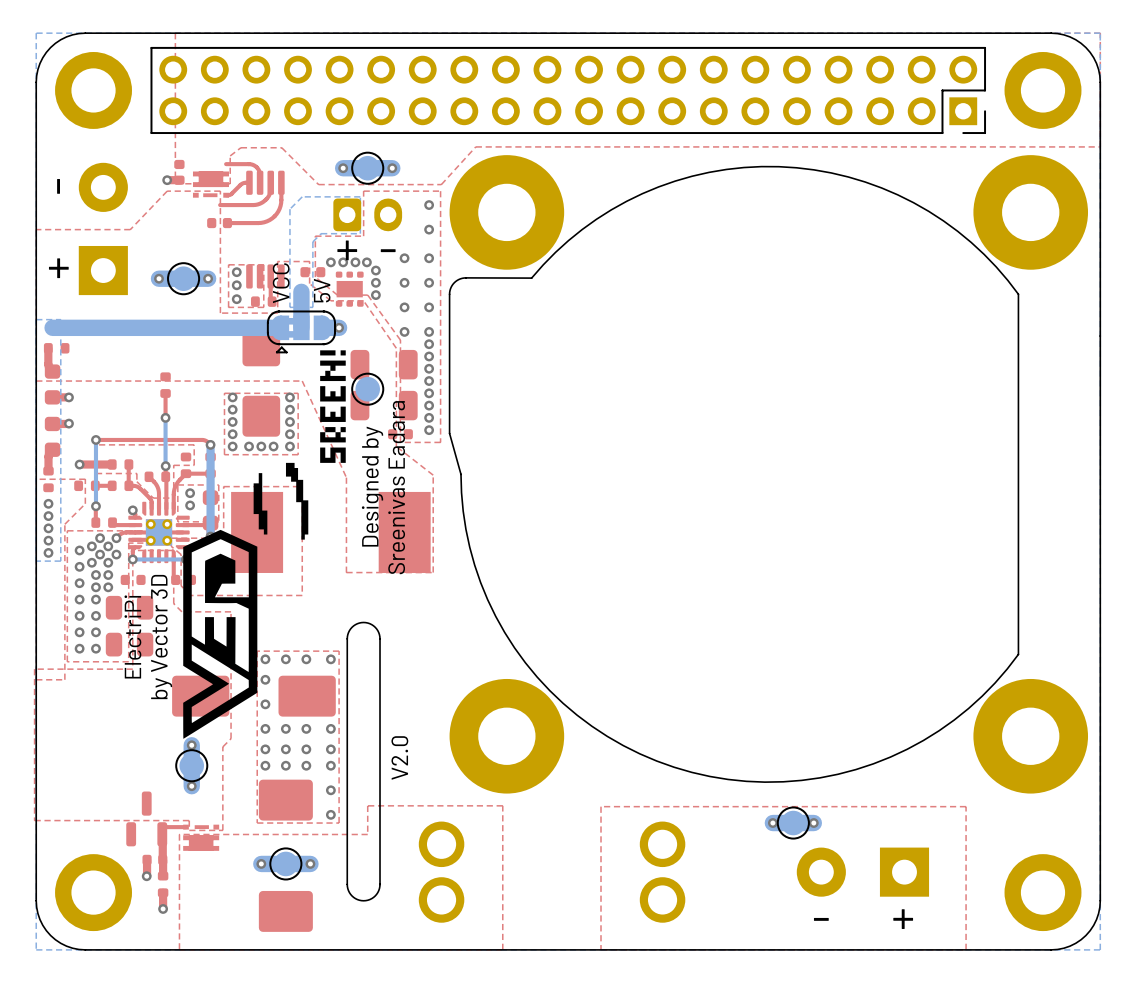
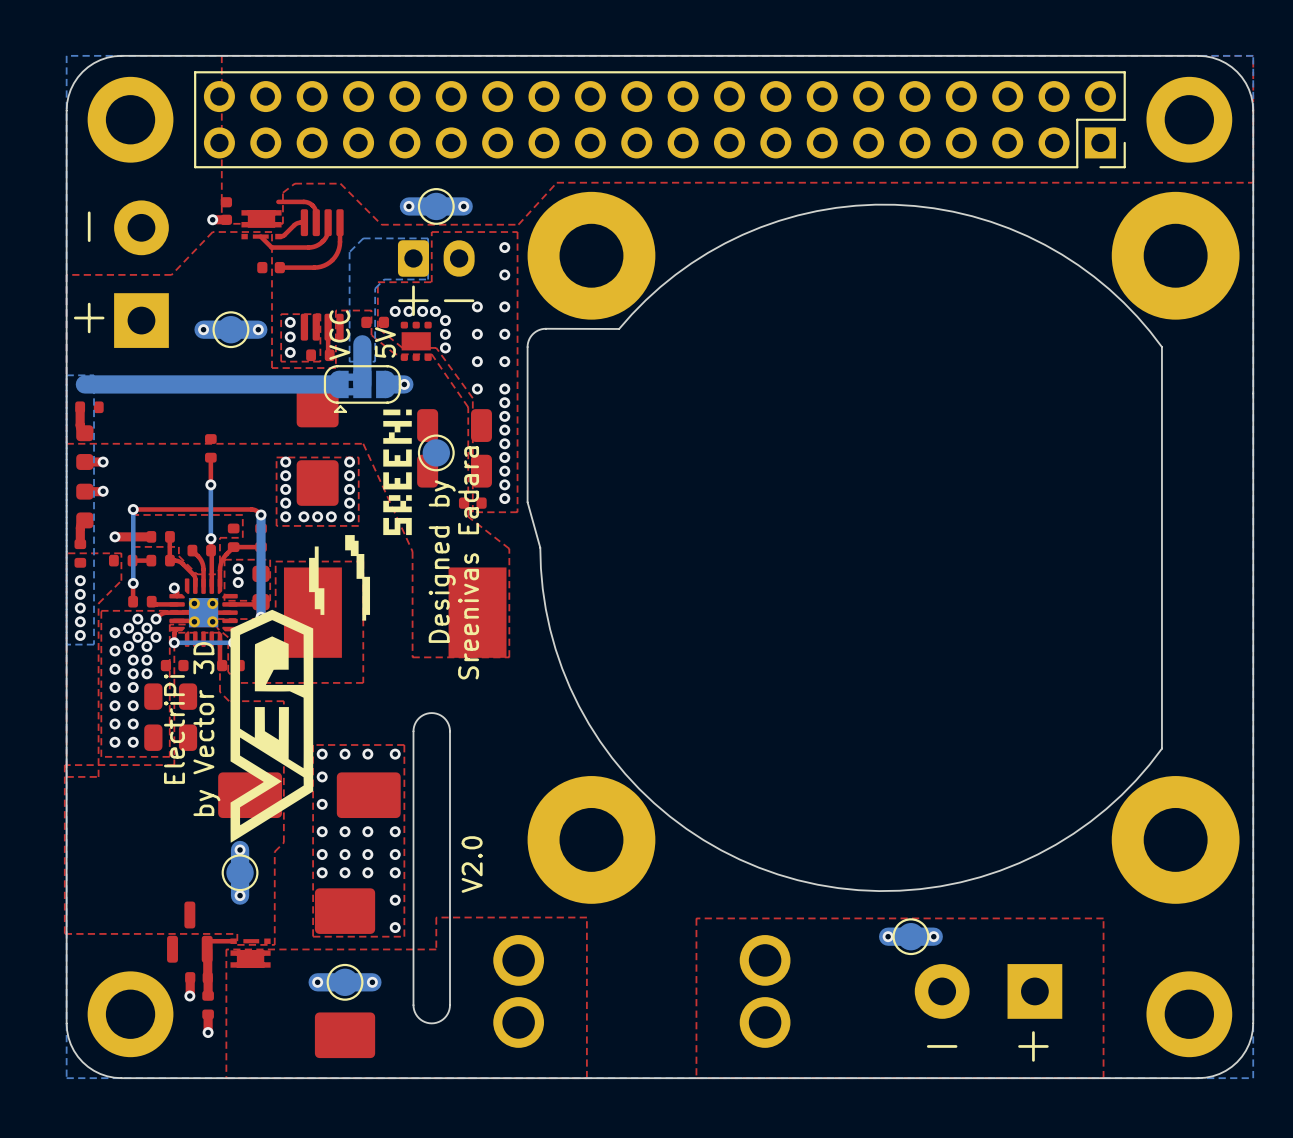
top track: none -> (260, 236) (271, 247)

